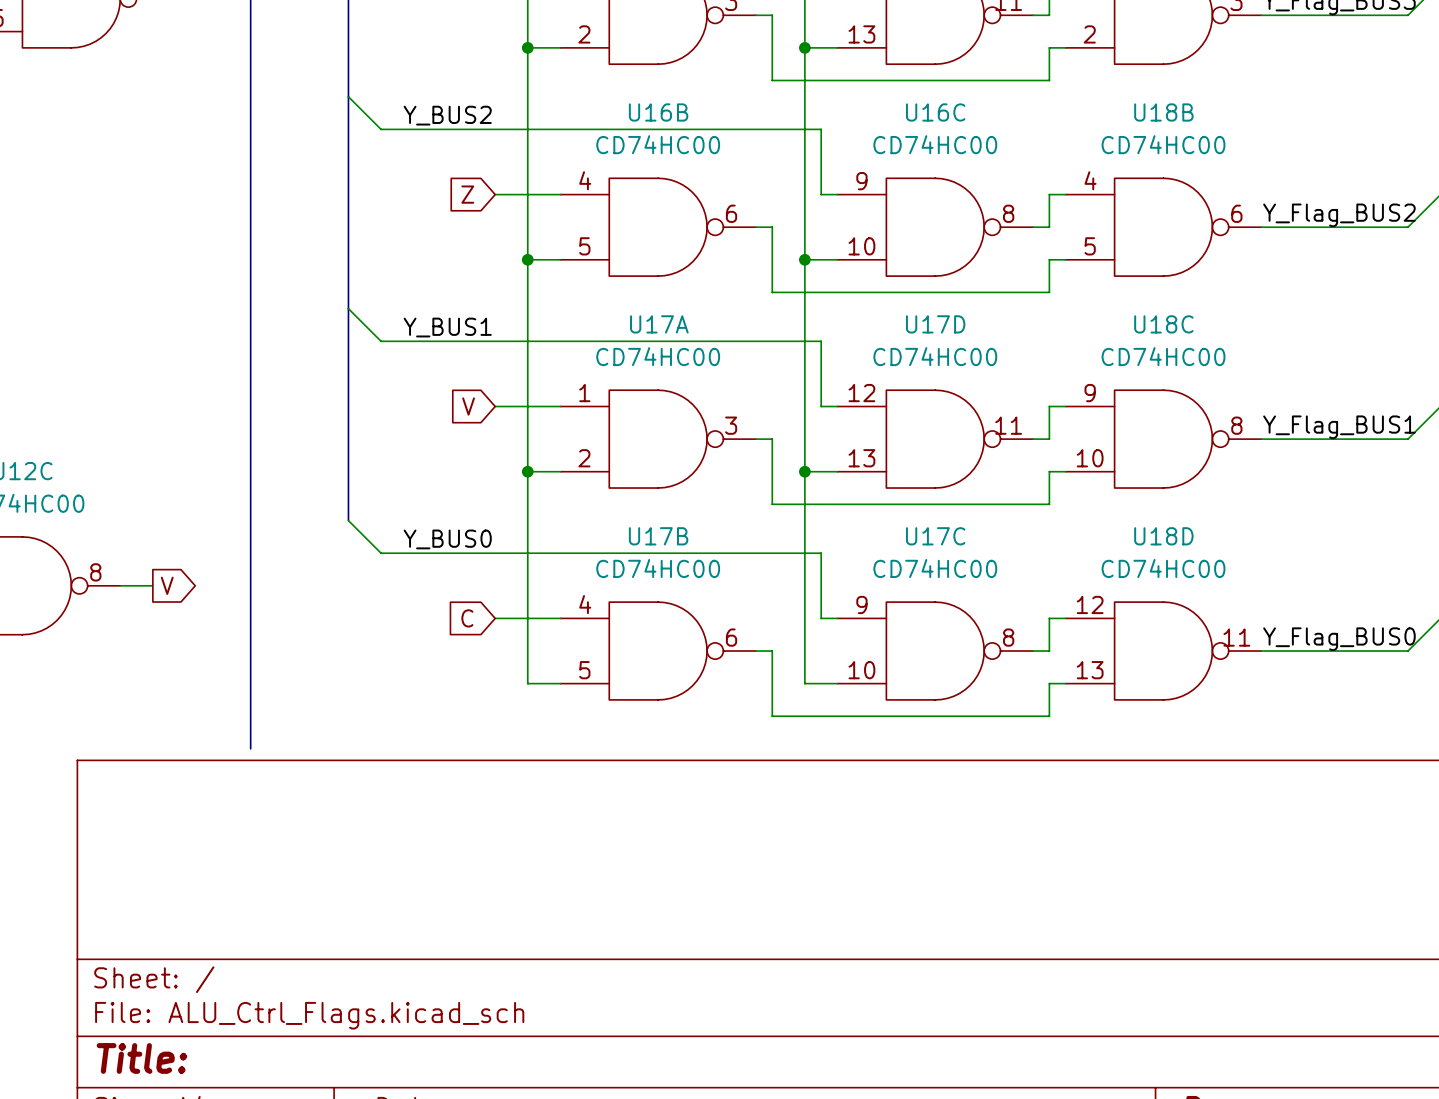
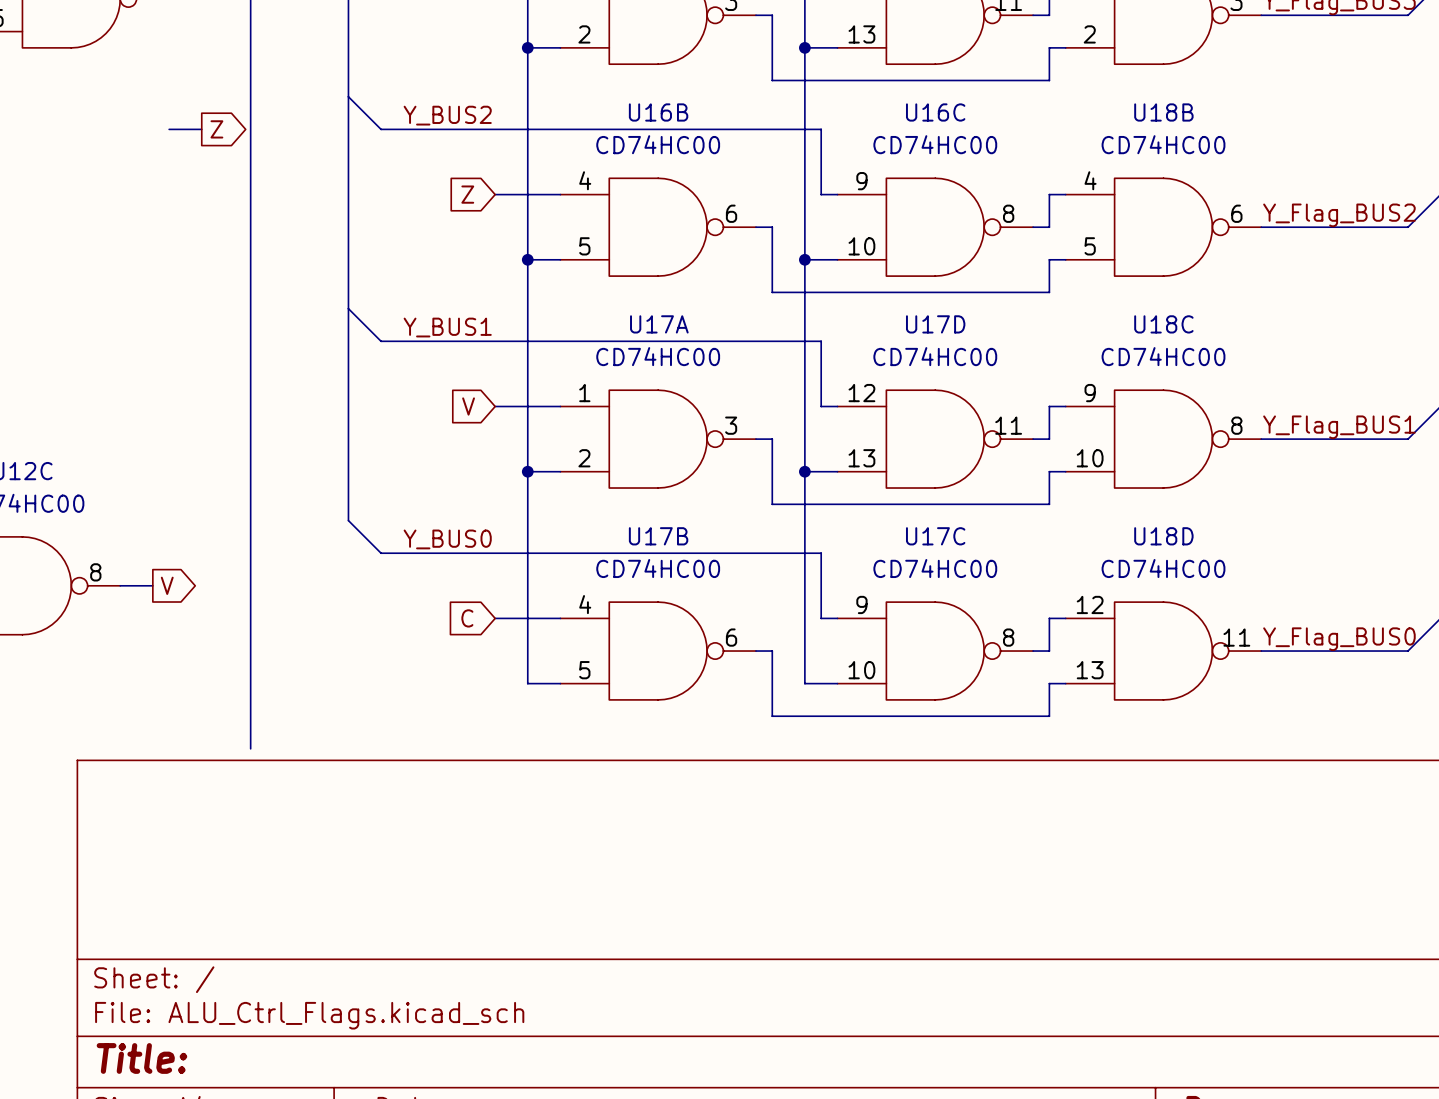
wire: none -> (169, 129) (201, 129)
global label: none -> Z (216, 129)

